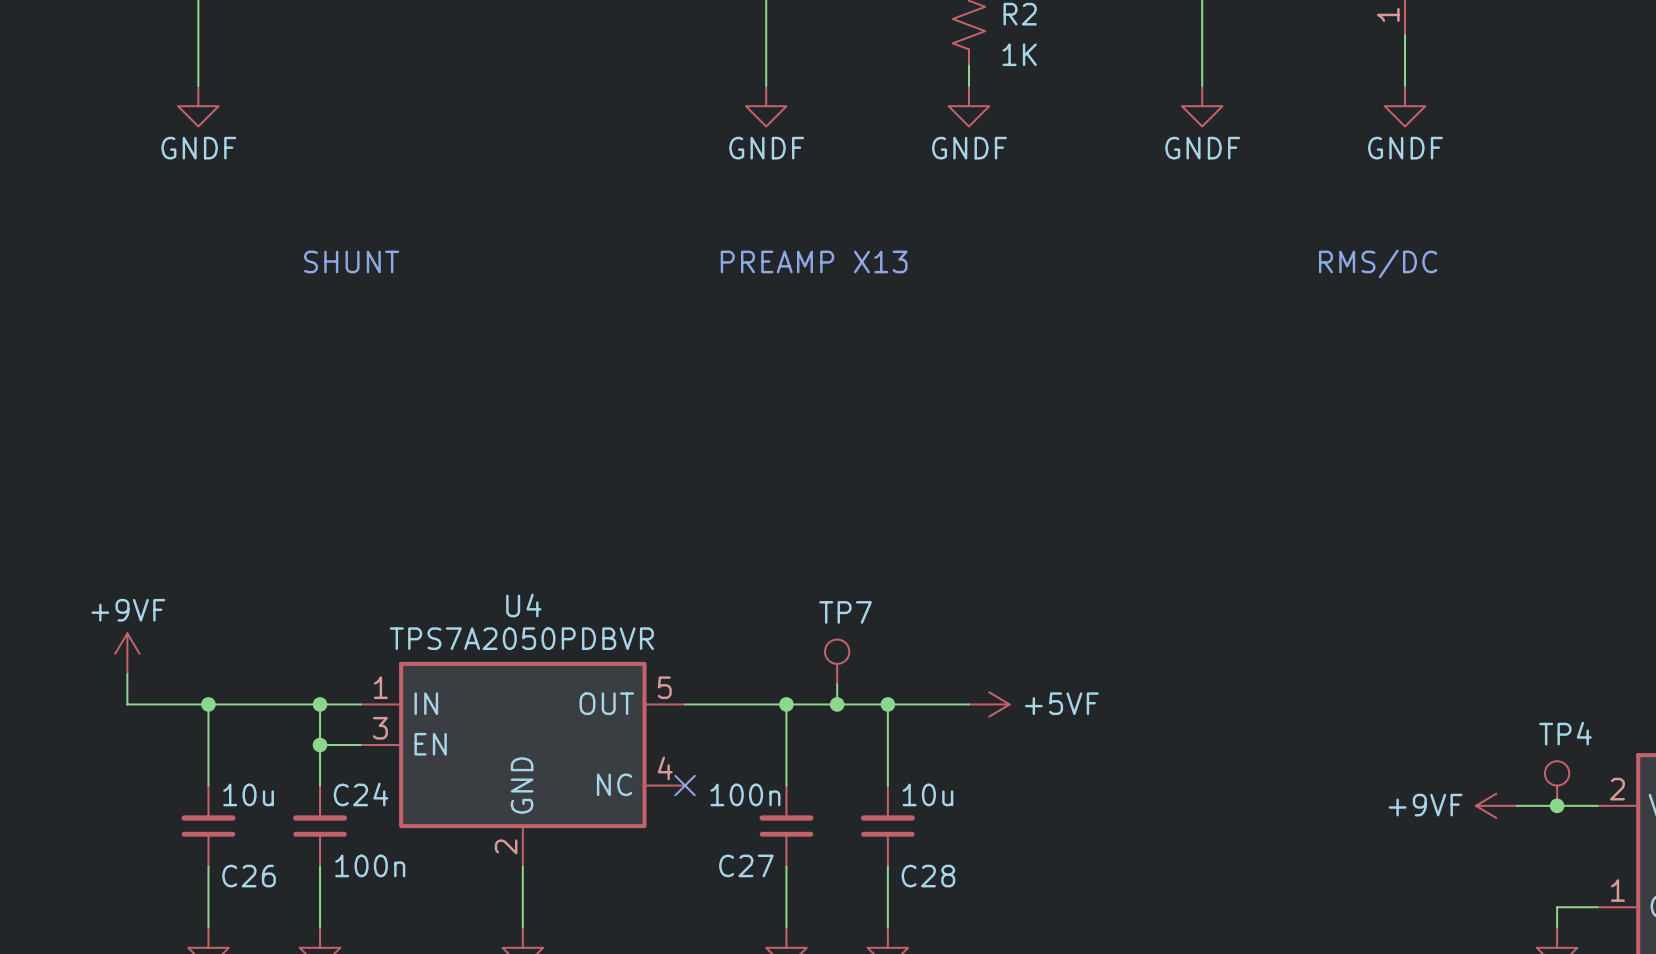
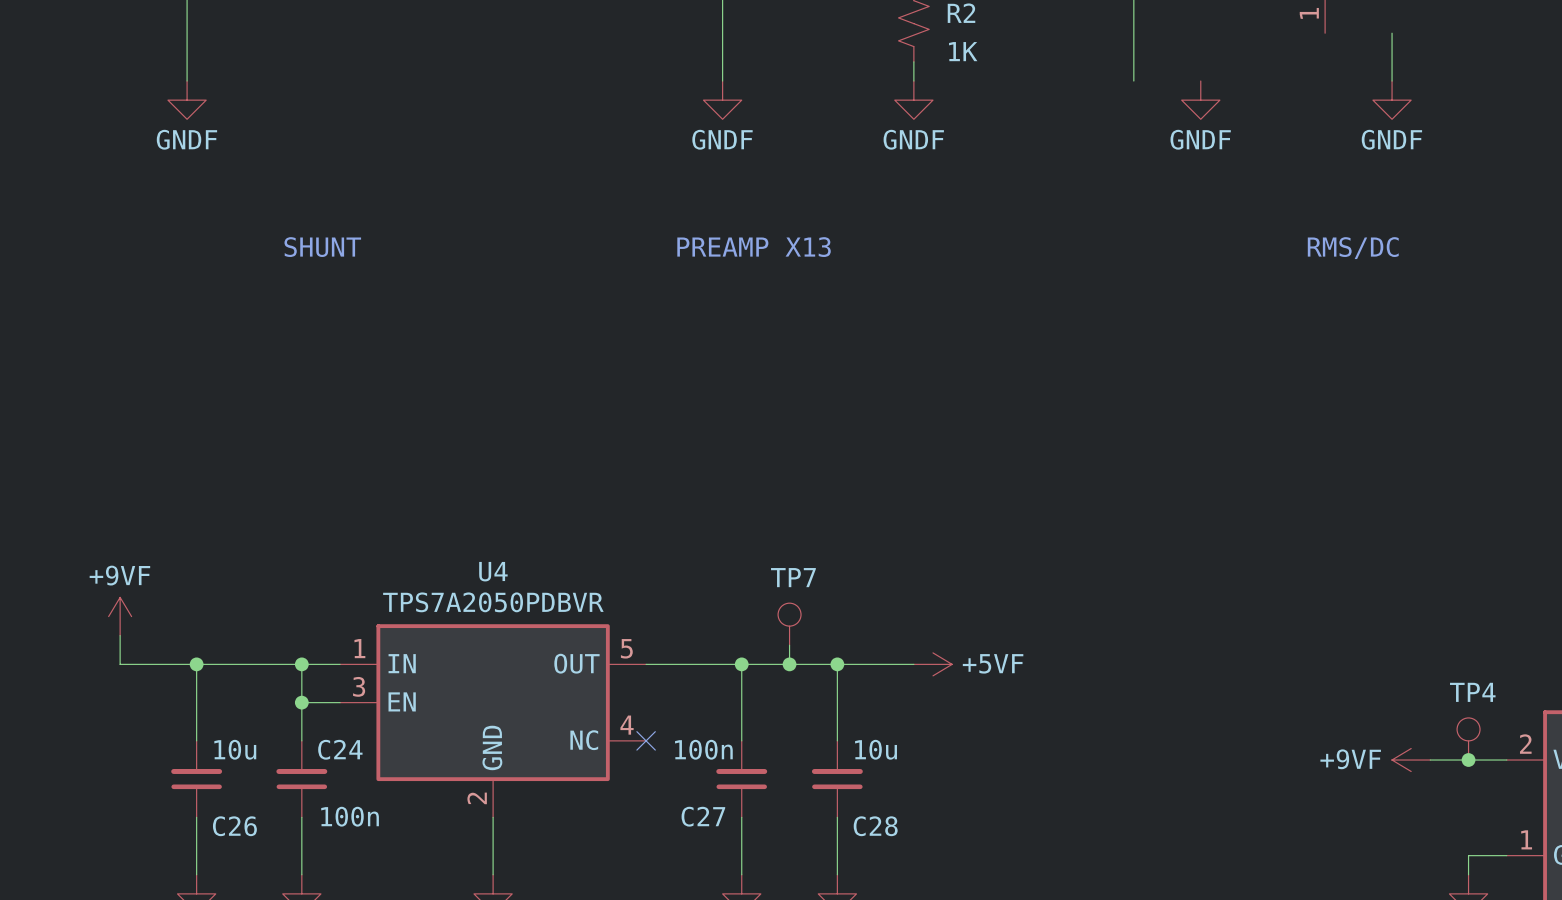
wire: (1405, 35) (1405, 85) -> (1392, 33) (1392, 81)
power symbol: GNDF (1202, 106) -> none
power symbol: none -> GNDF (1200, 100)
power symbol: GNDF (1405, 106) -> none
power symbol: none -> GNDF (1392, 100)
text position: RMS/DC (1378, 263) -> RMS/DC (1353, 248)

